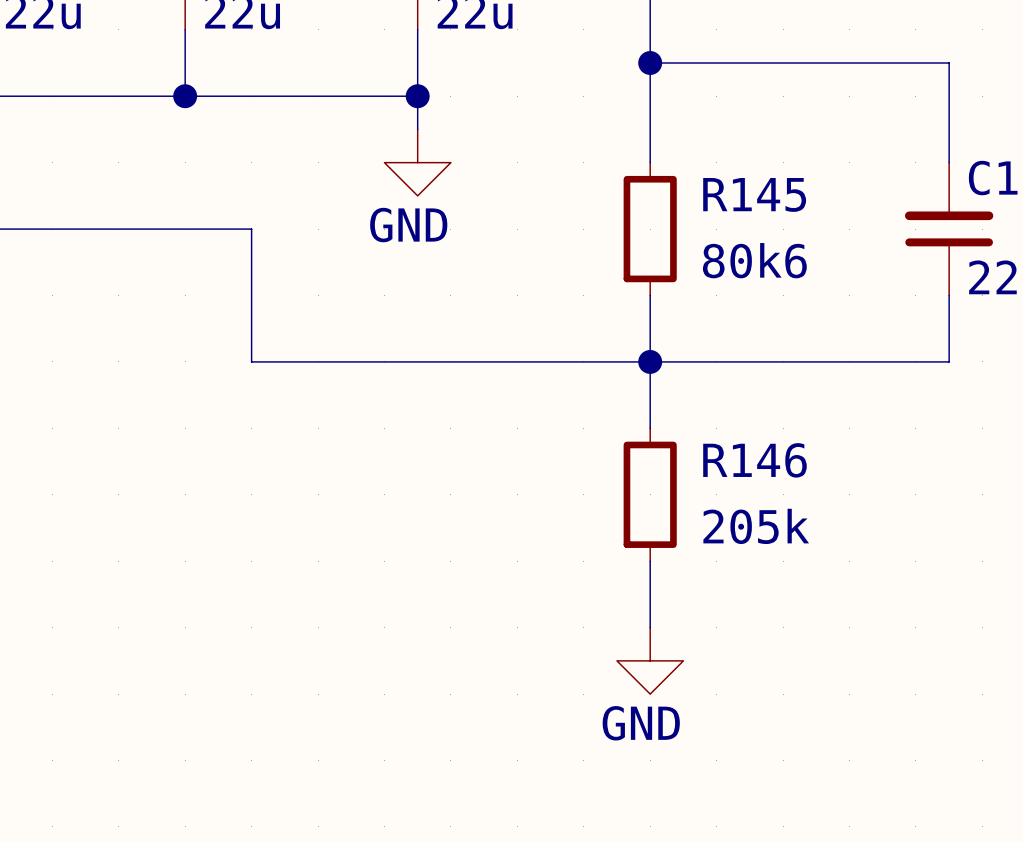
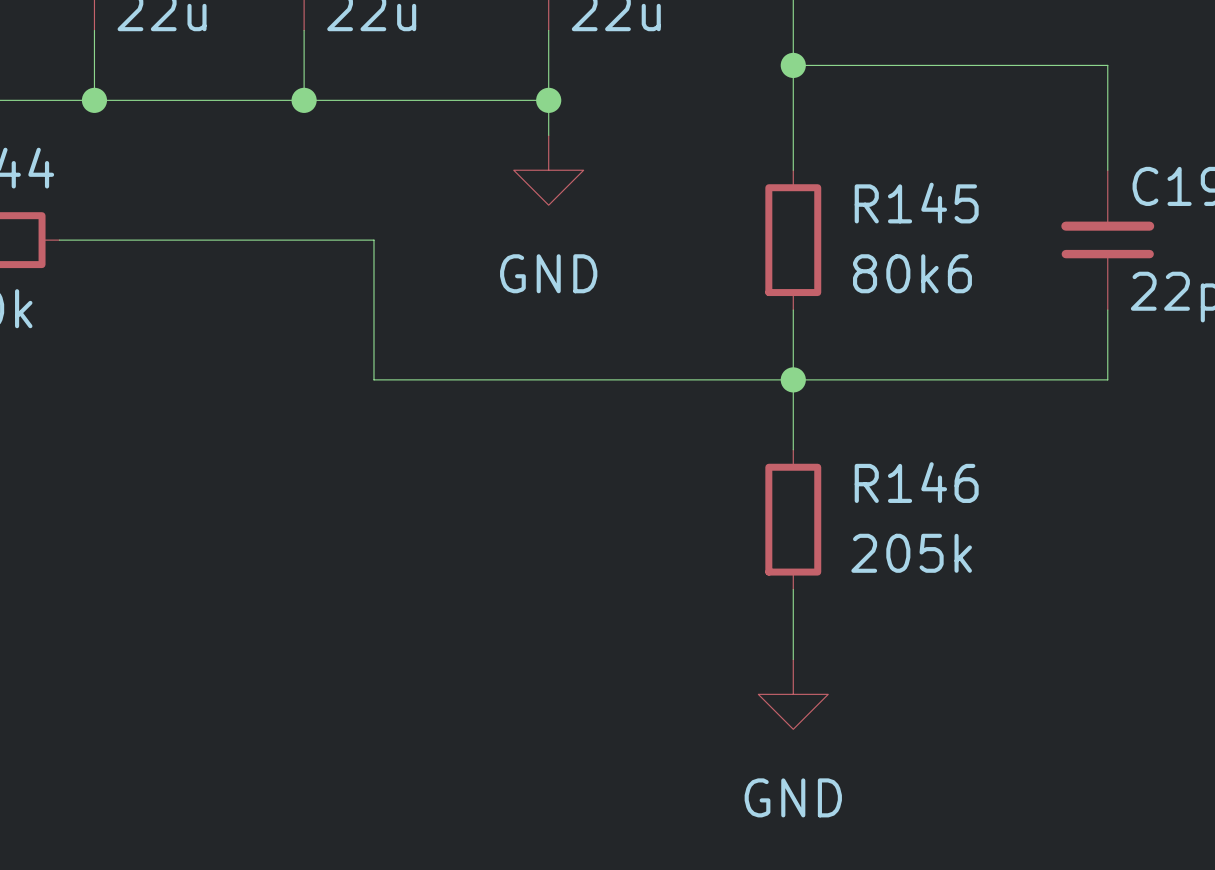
power symbol text position: GND (408, 225) -> GND (548, 273)
power symbol text position: GND (641, 723) -> GND (793, 797)

